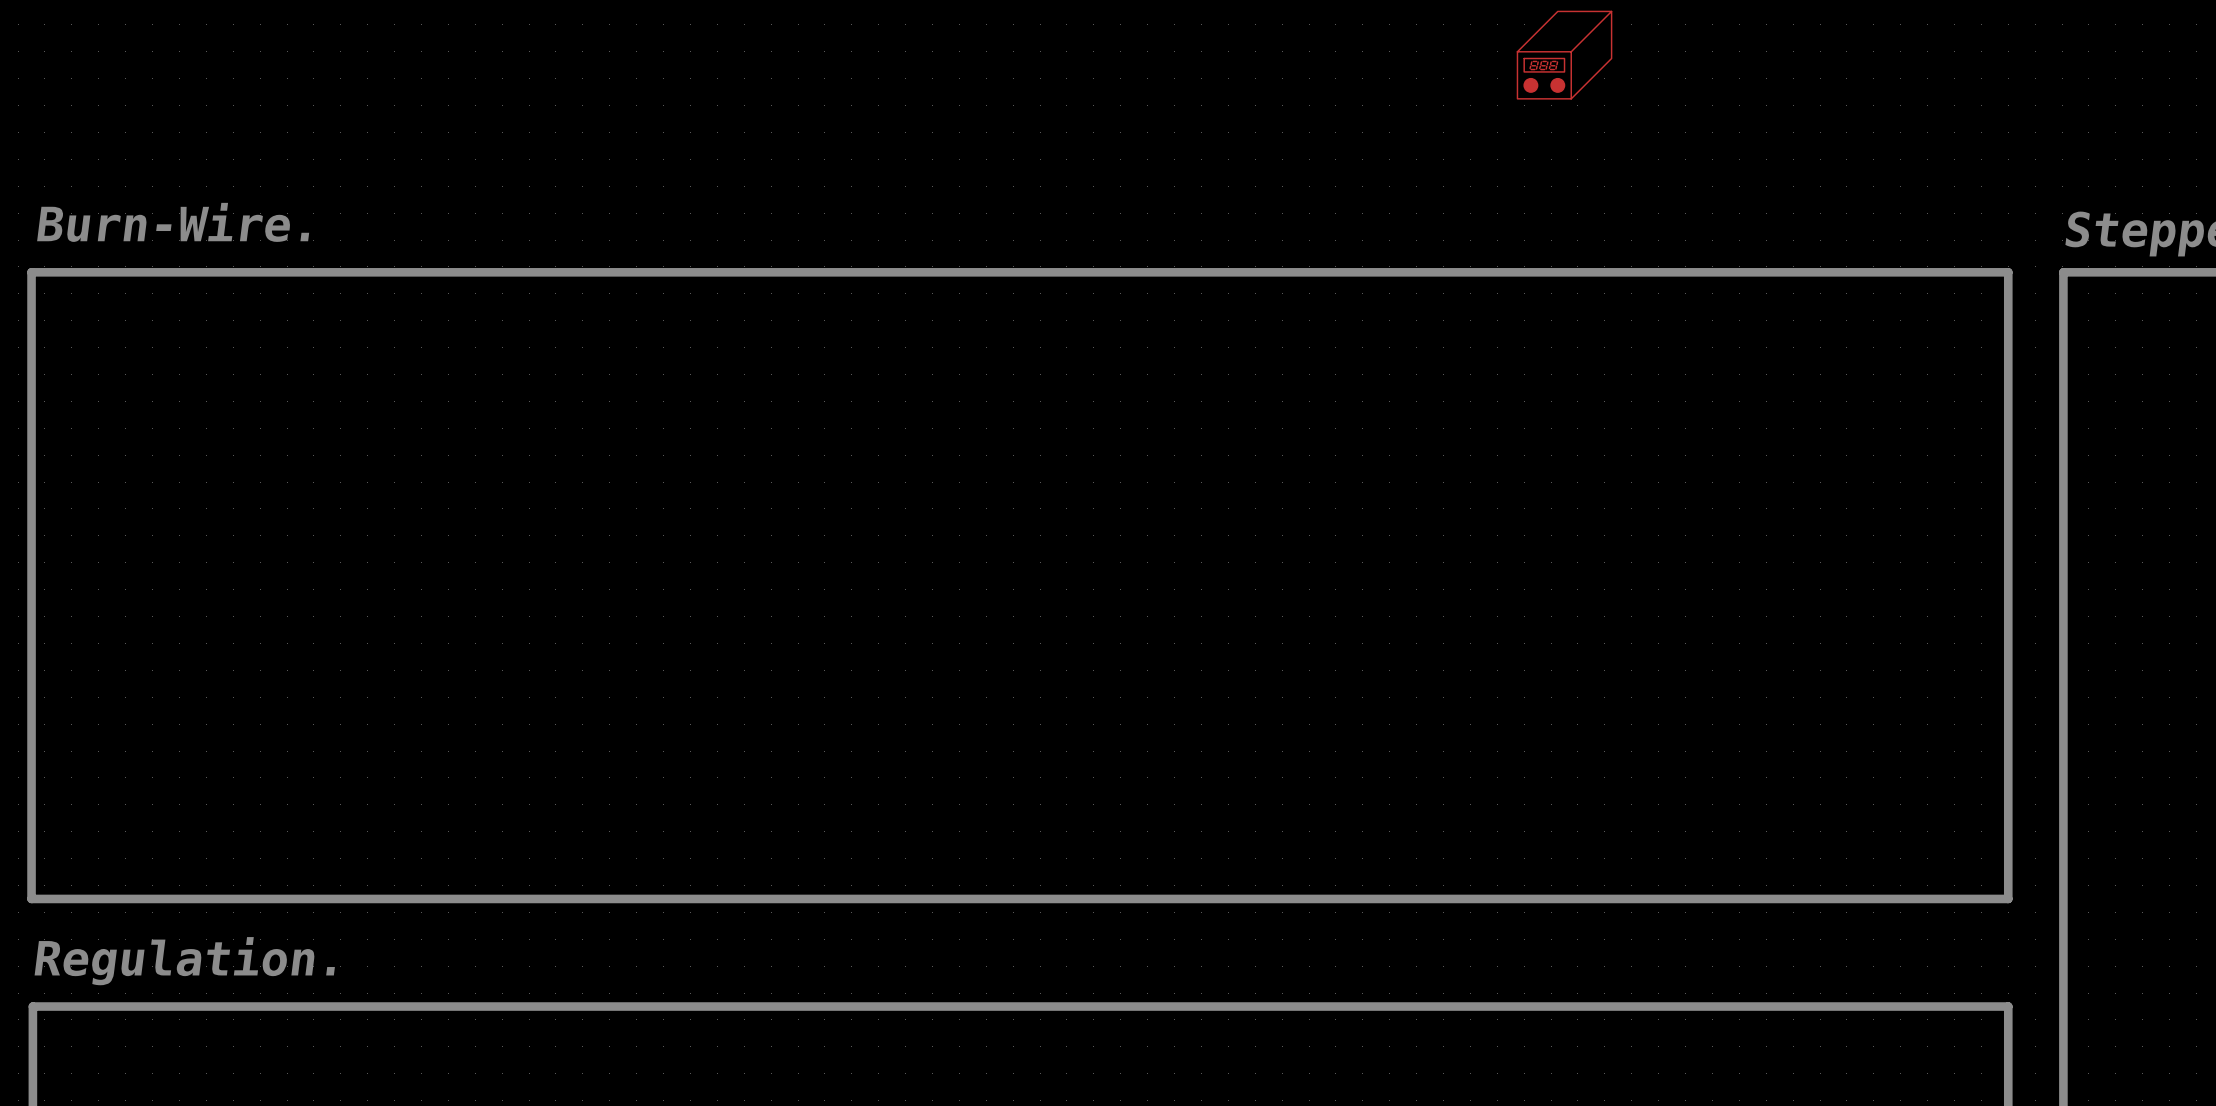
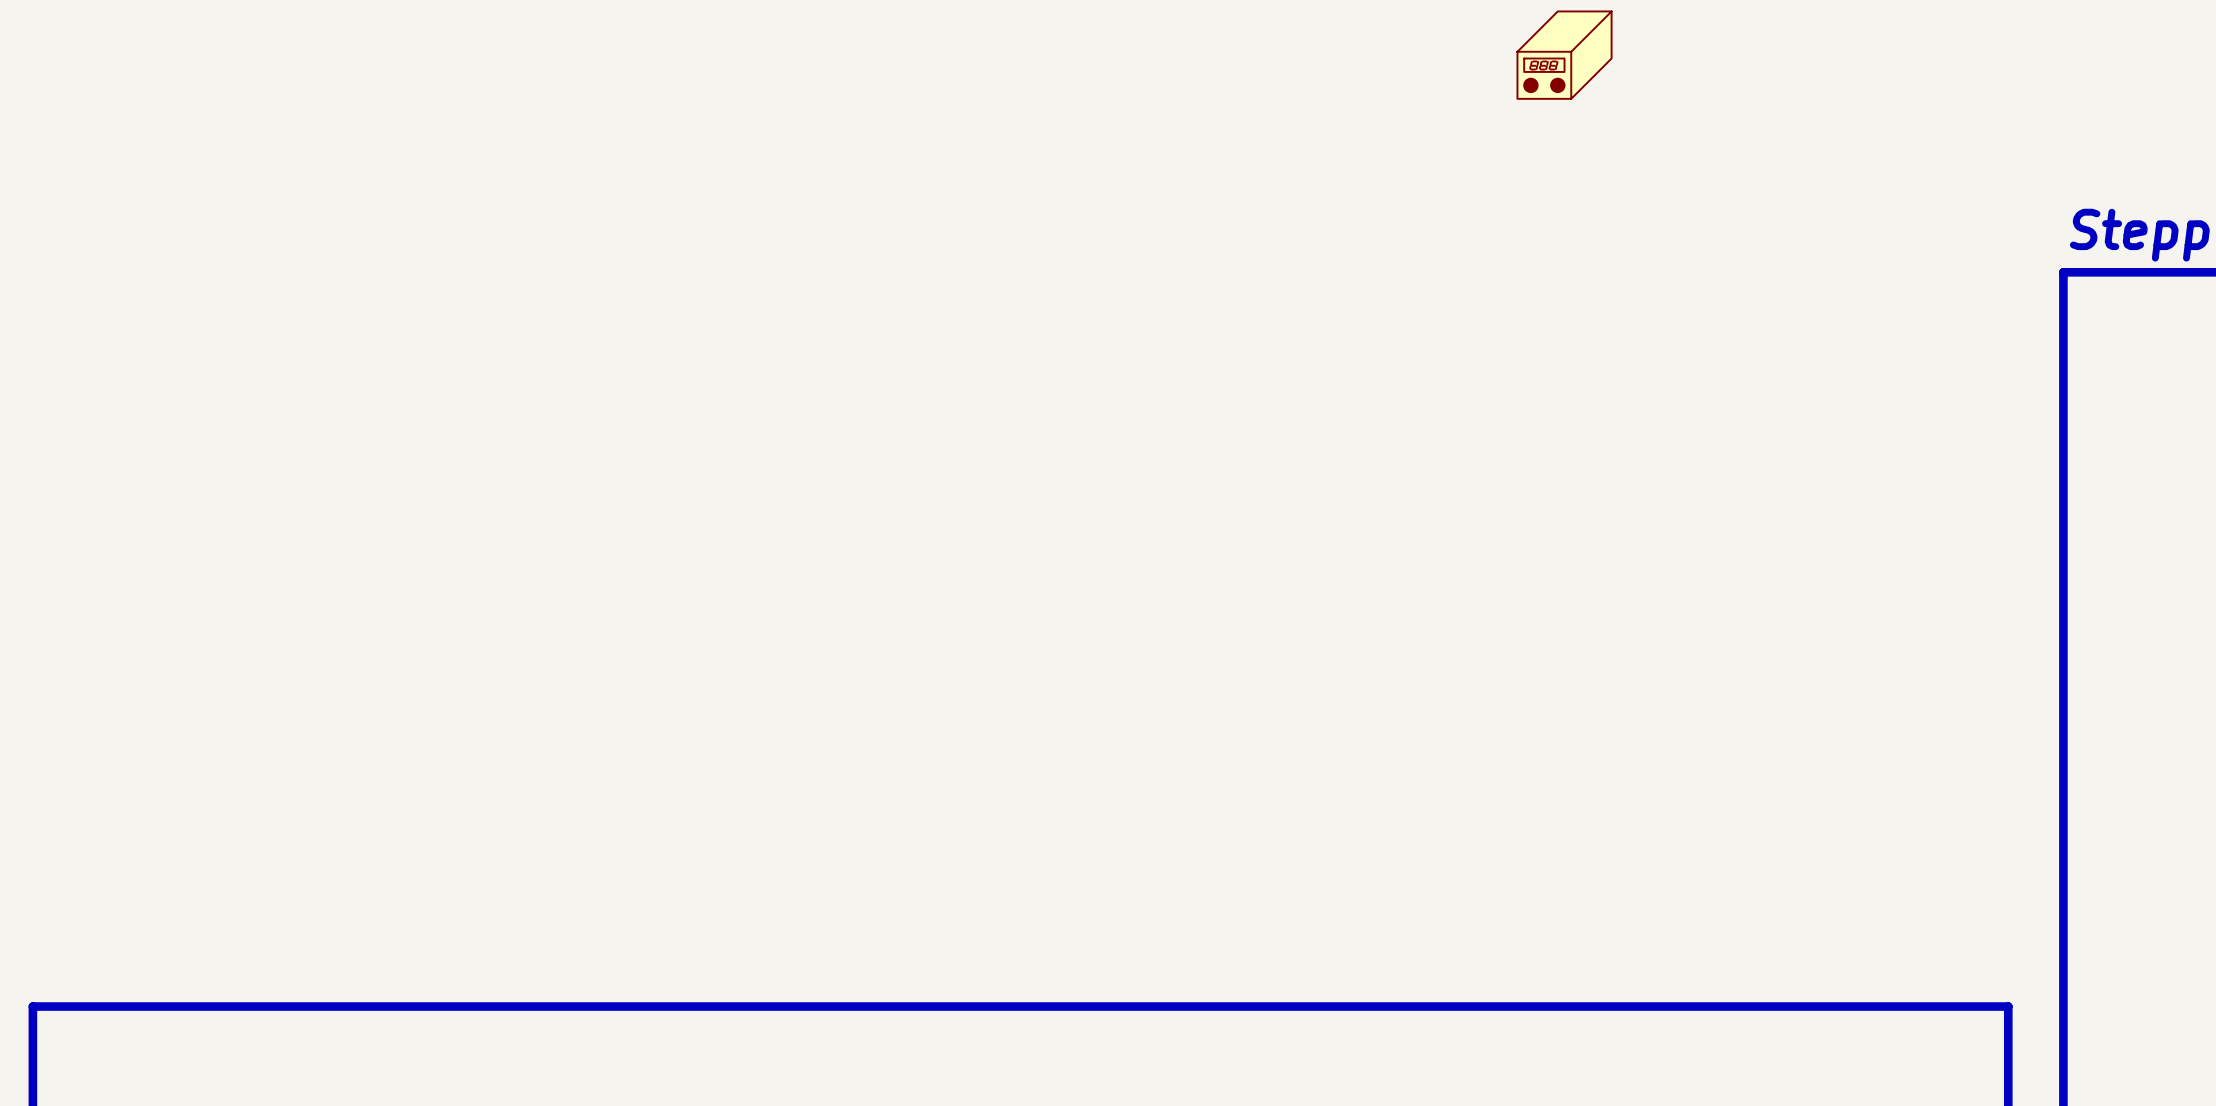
text: Burn-Wire. (173, 222) -> none
line: (31, 272) (2008, 272) (2008, 898) (31, 898) (31, 272) -> none
text: Regulation. (184, 961) -> none

